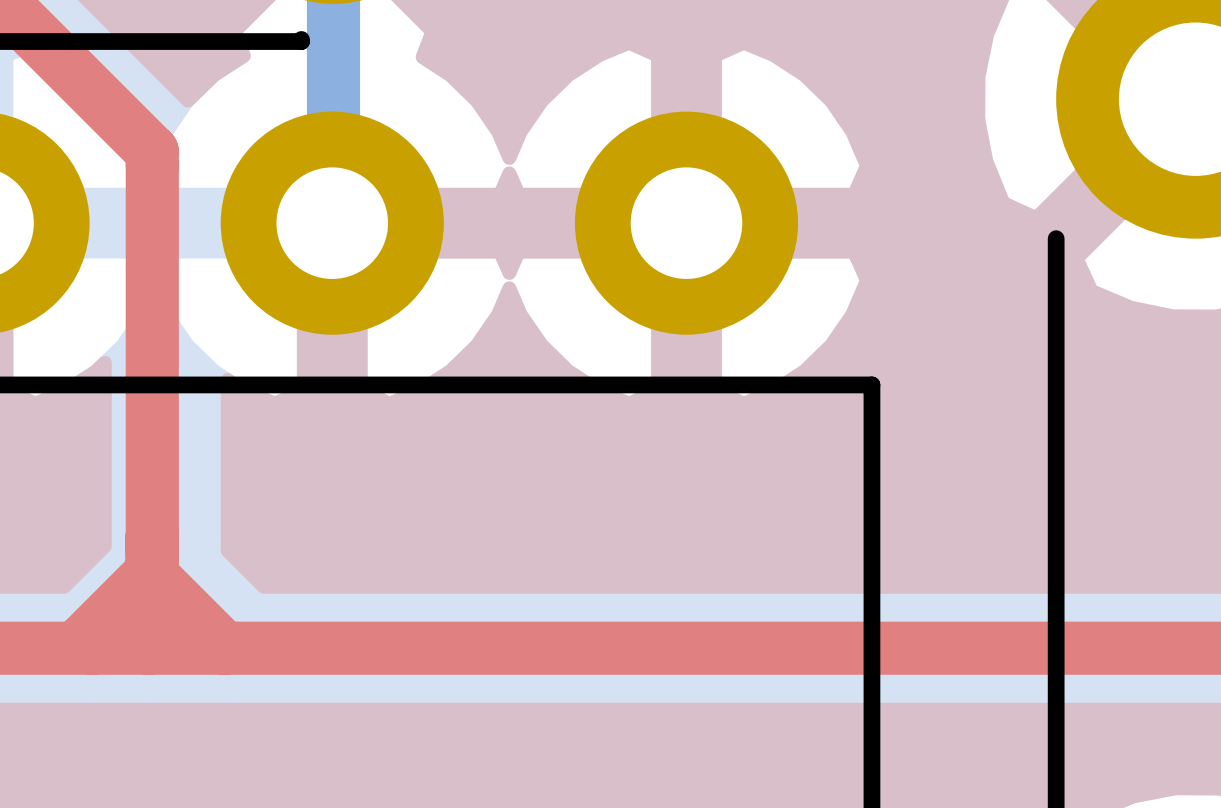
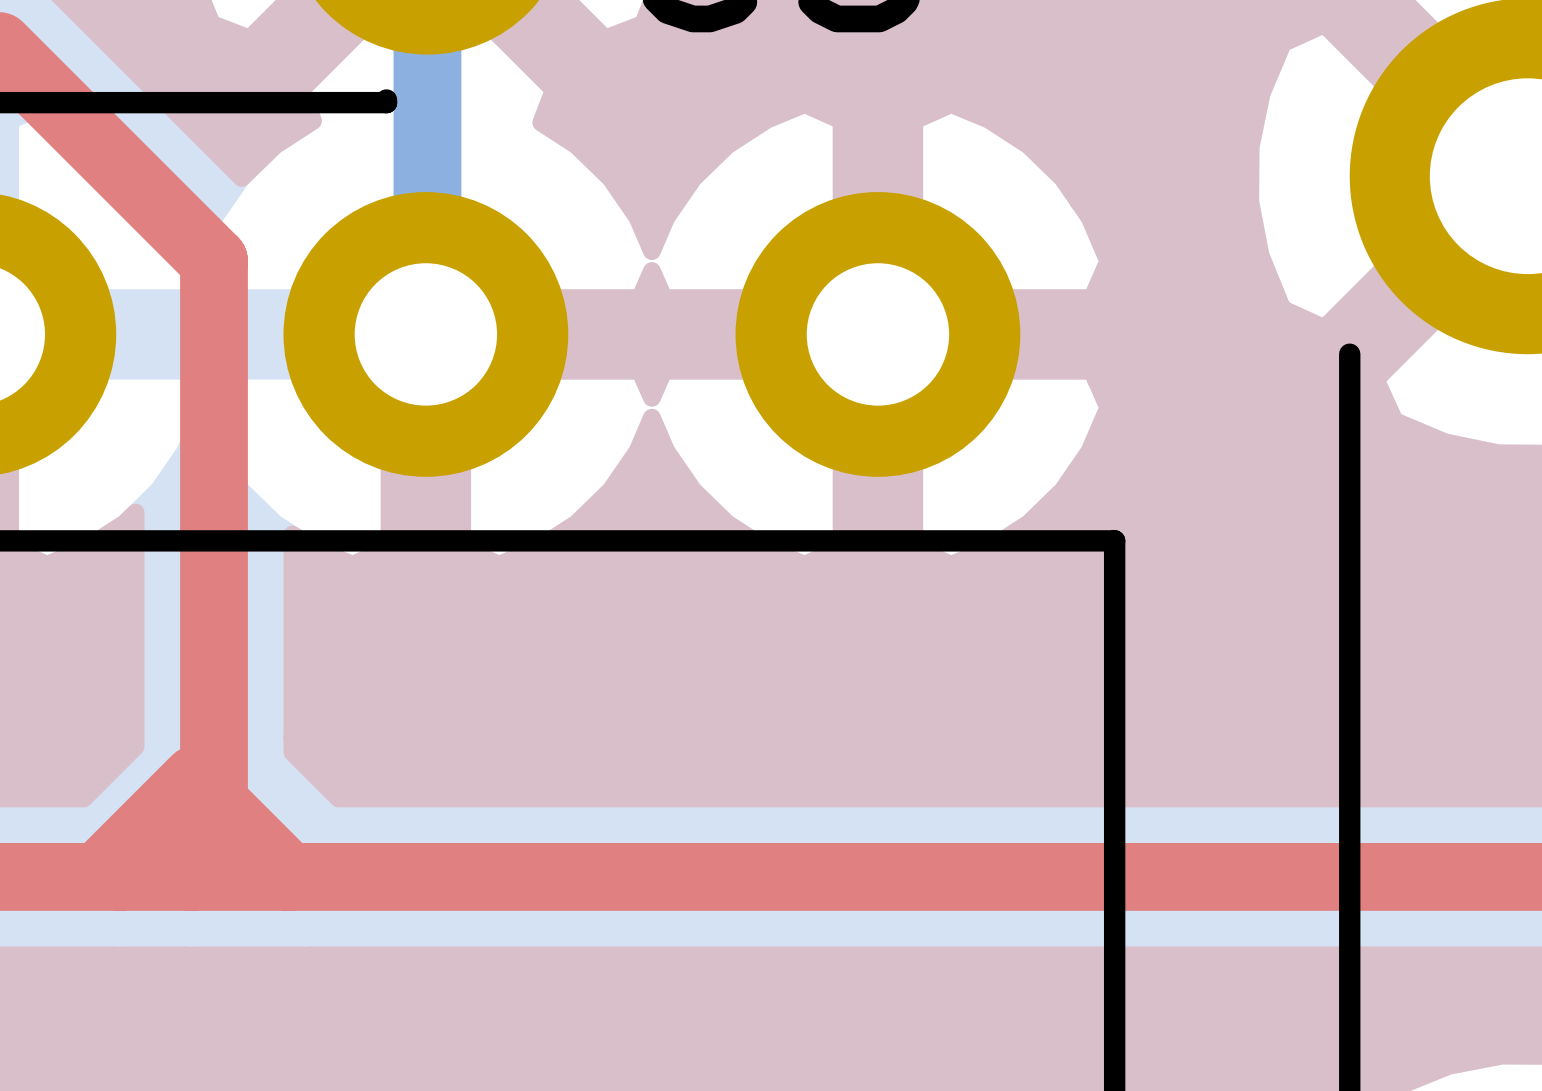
top track: (152, 151) (152, 630) -> (196, 243) (214, 261) (214, 854)

